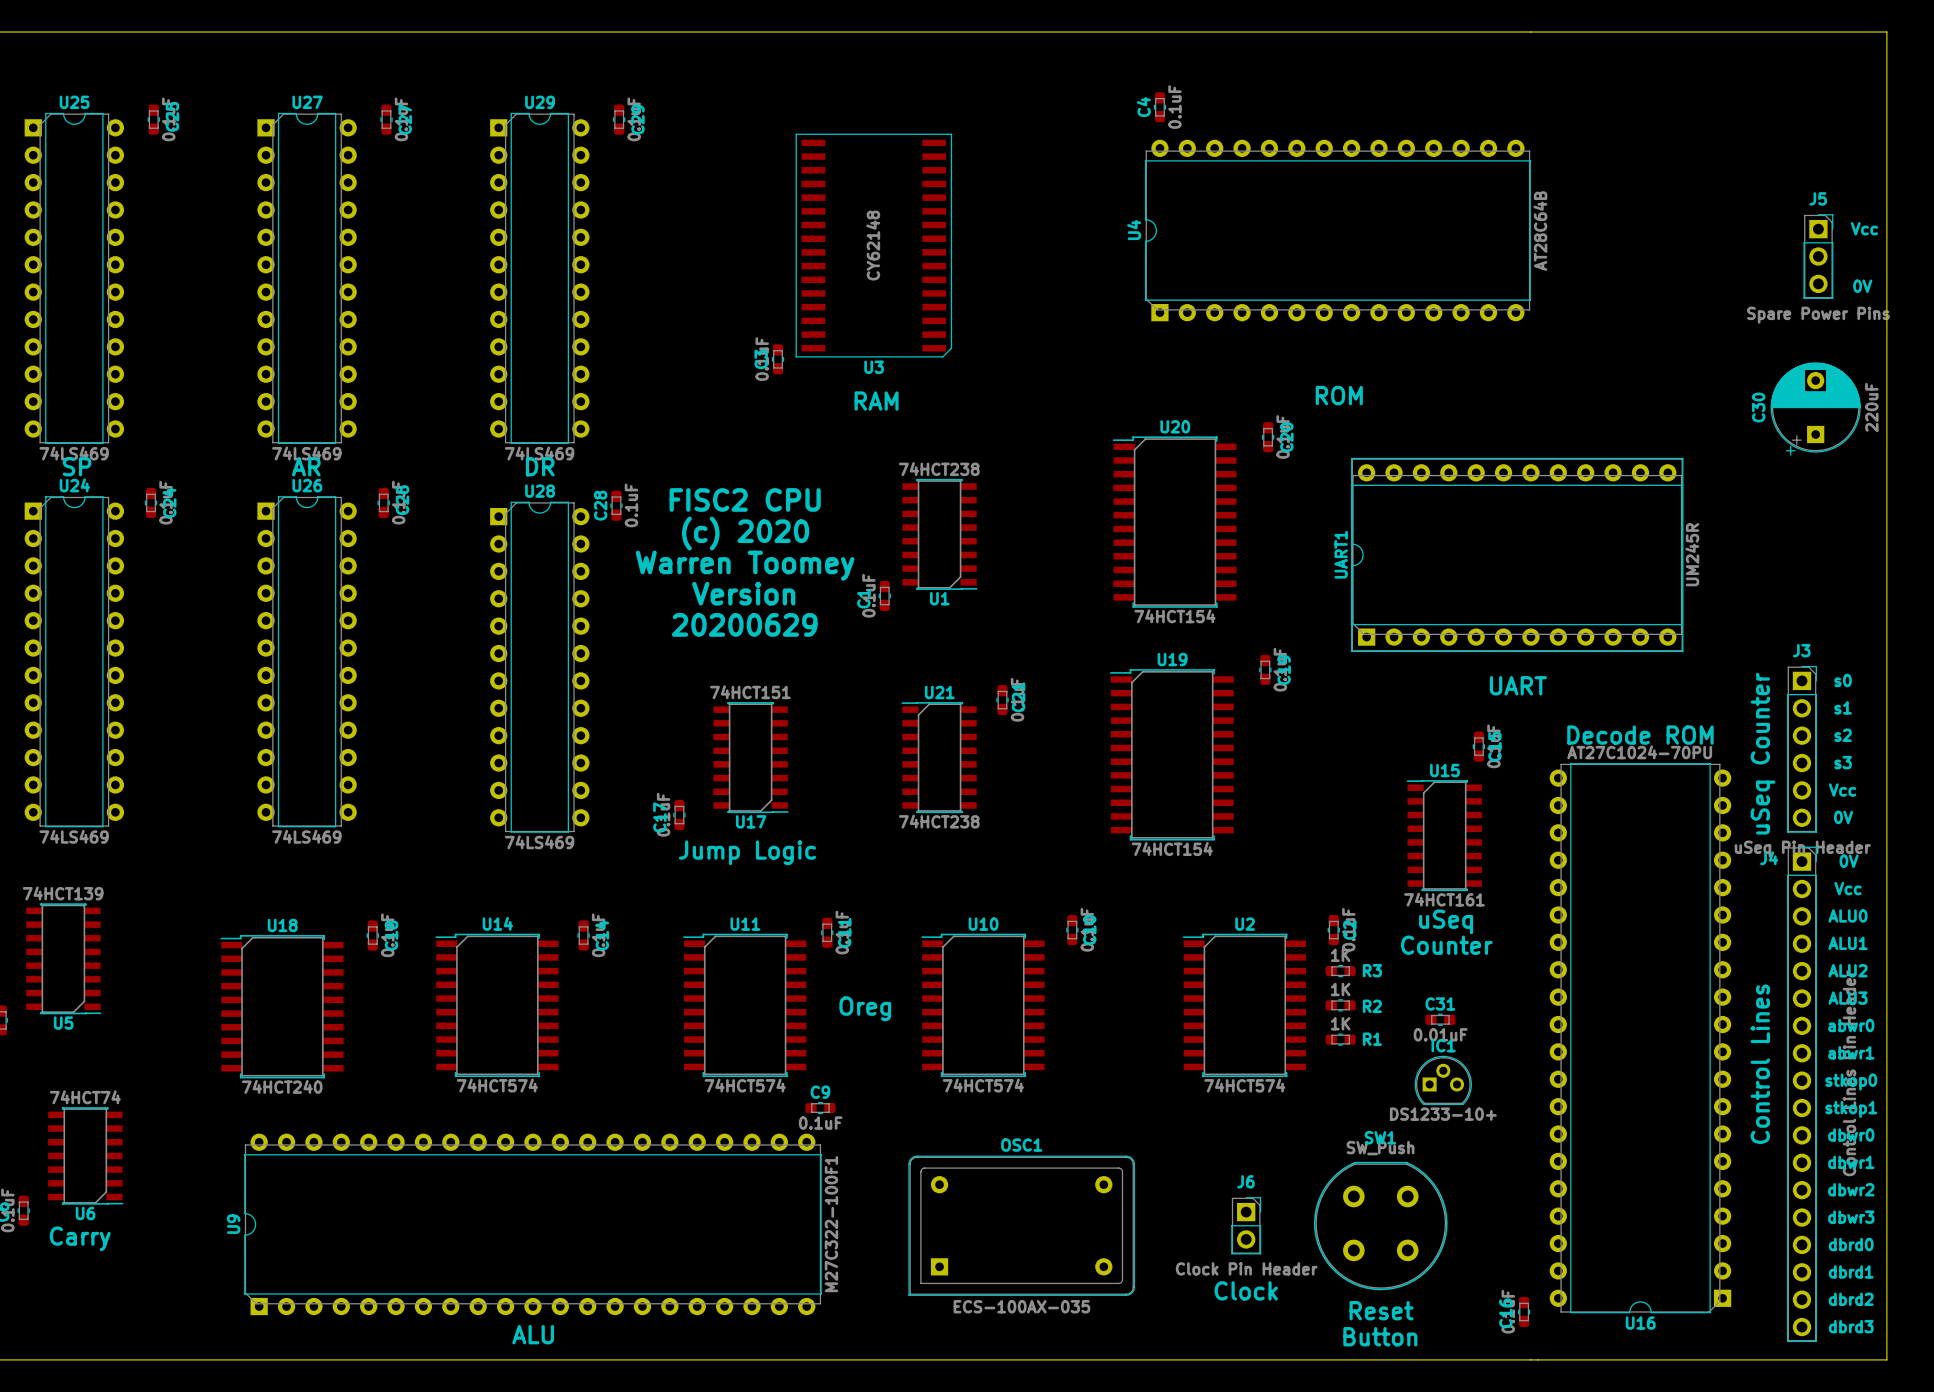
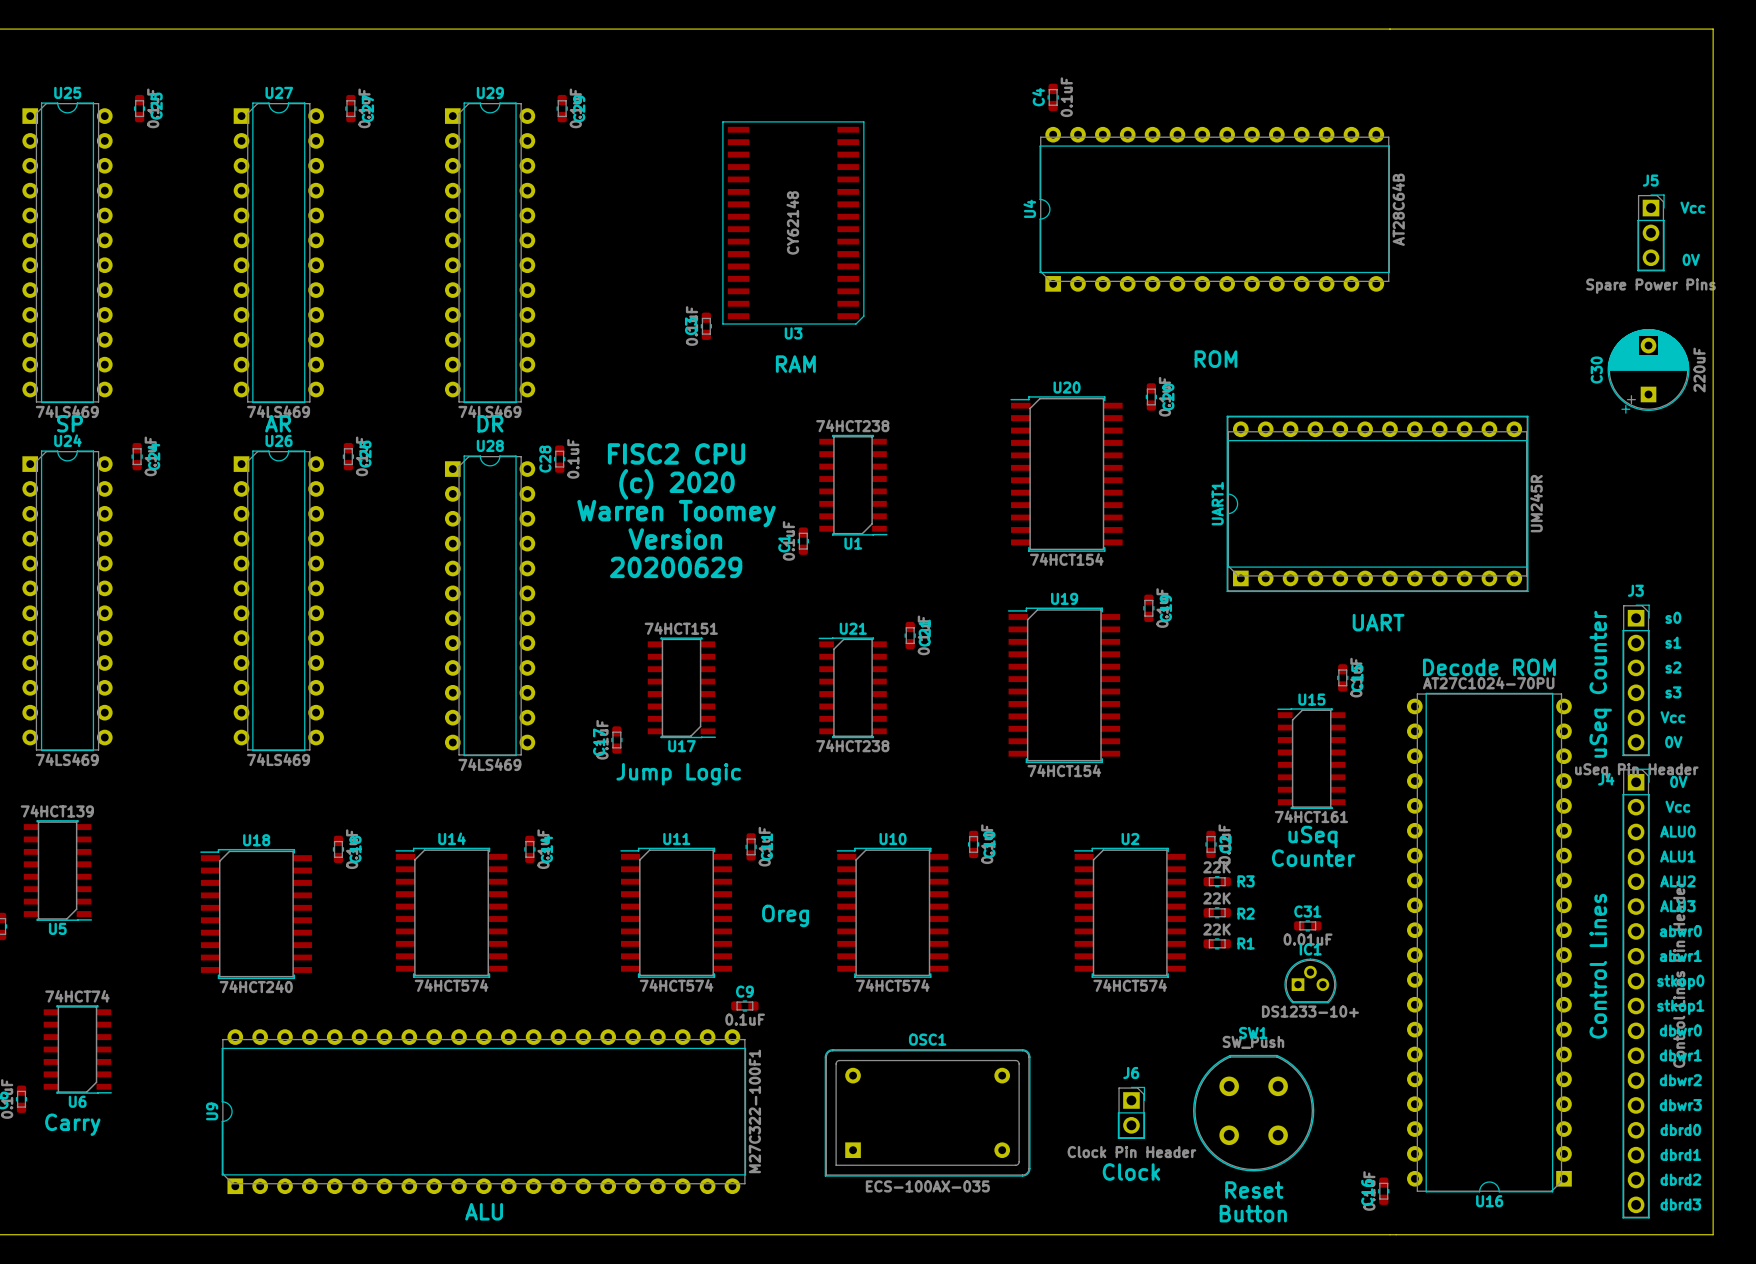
R3 value: 1K (1340, 955) -> 22K (1216, 867)
R2 value: 1K (1340, 989) -> 22K (1216, 898)
R1 value: 1K (1340, 1023) -> 22K (1216, 929)

